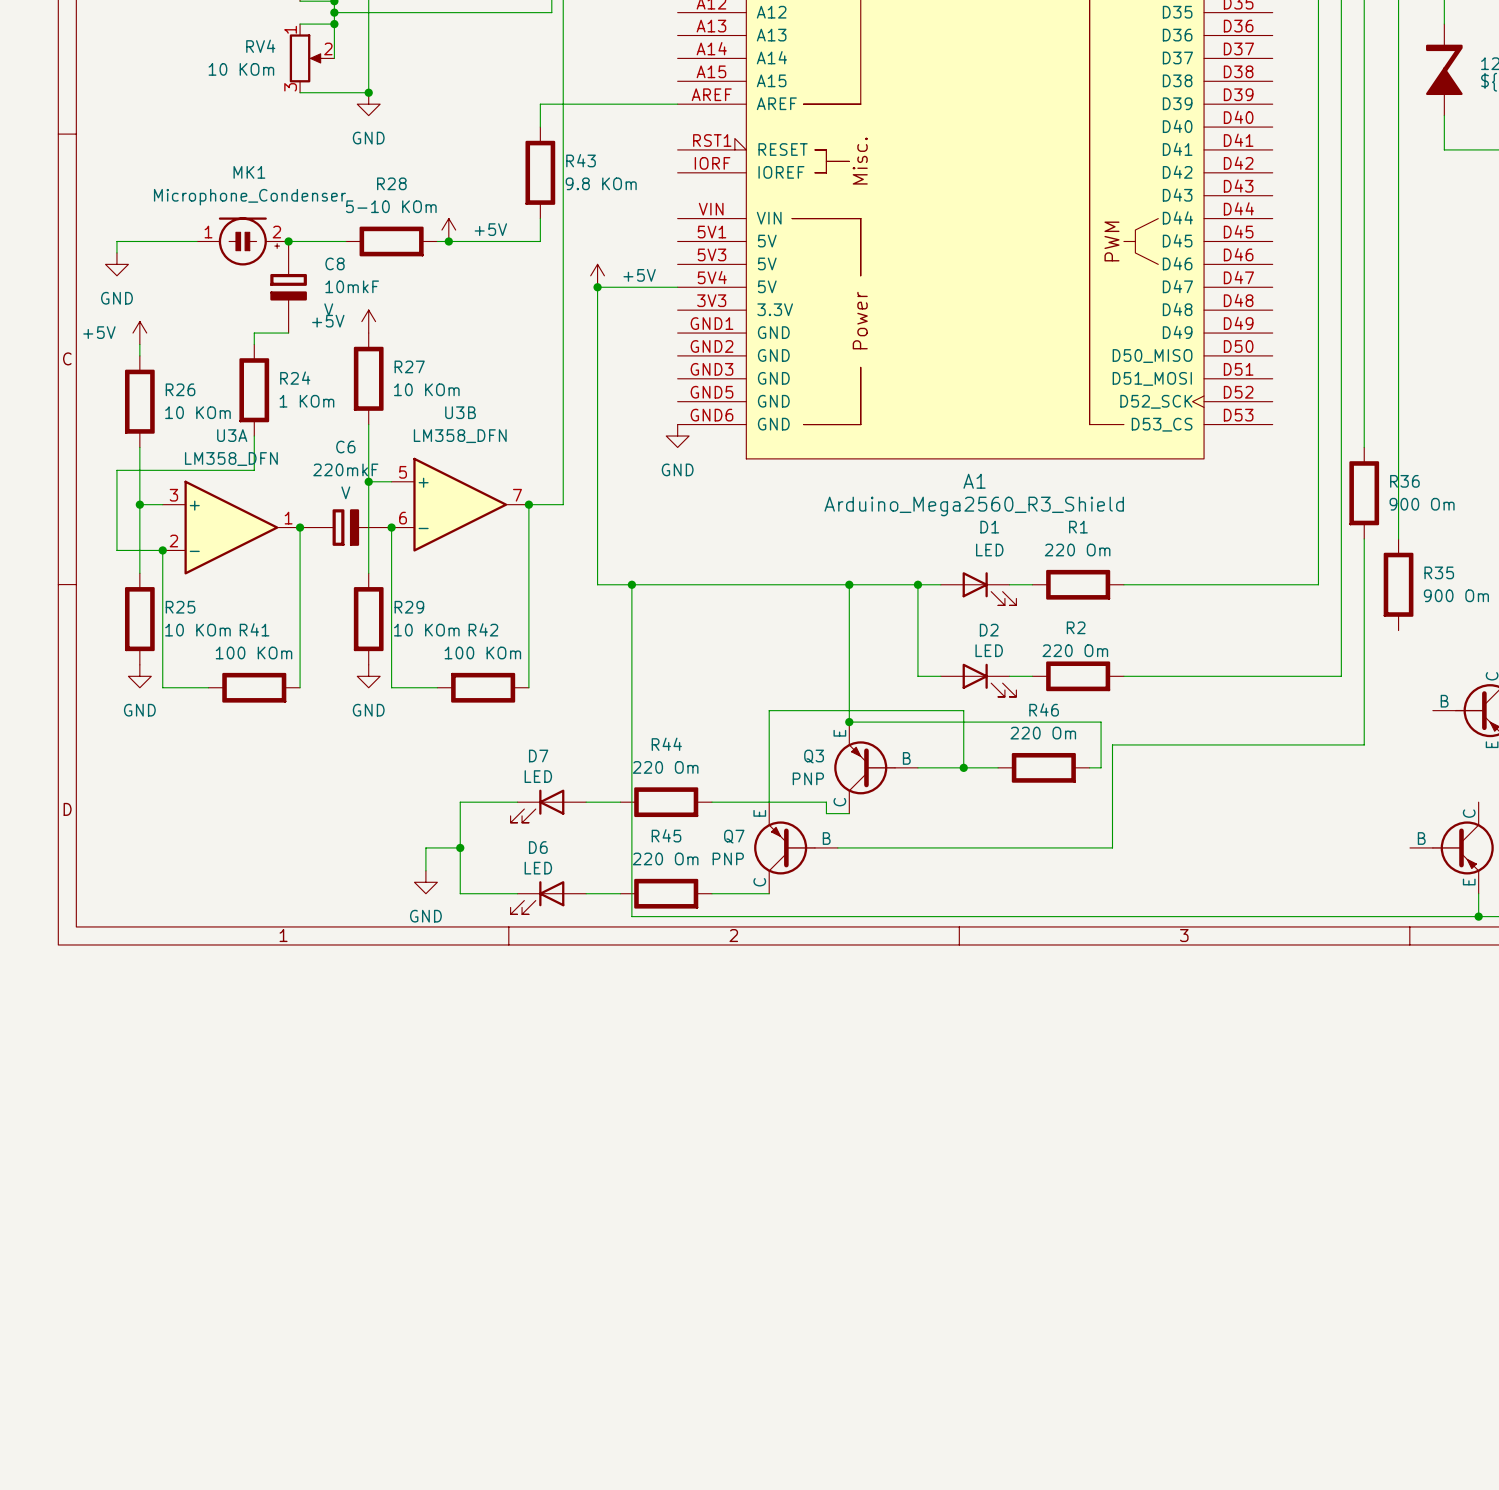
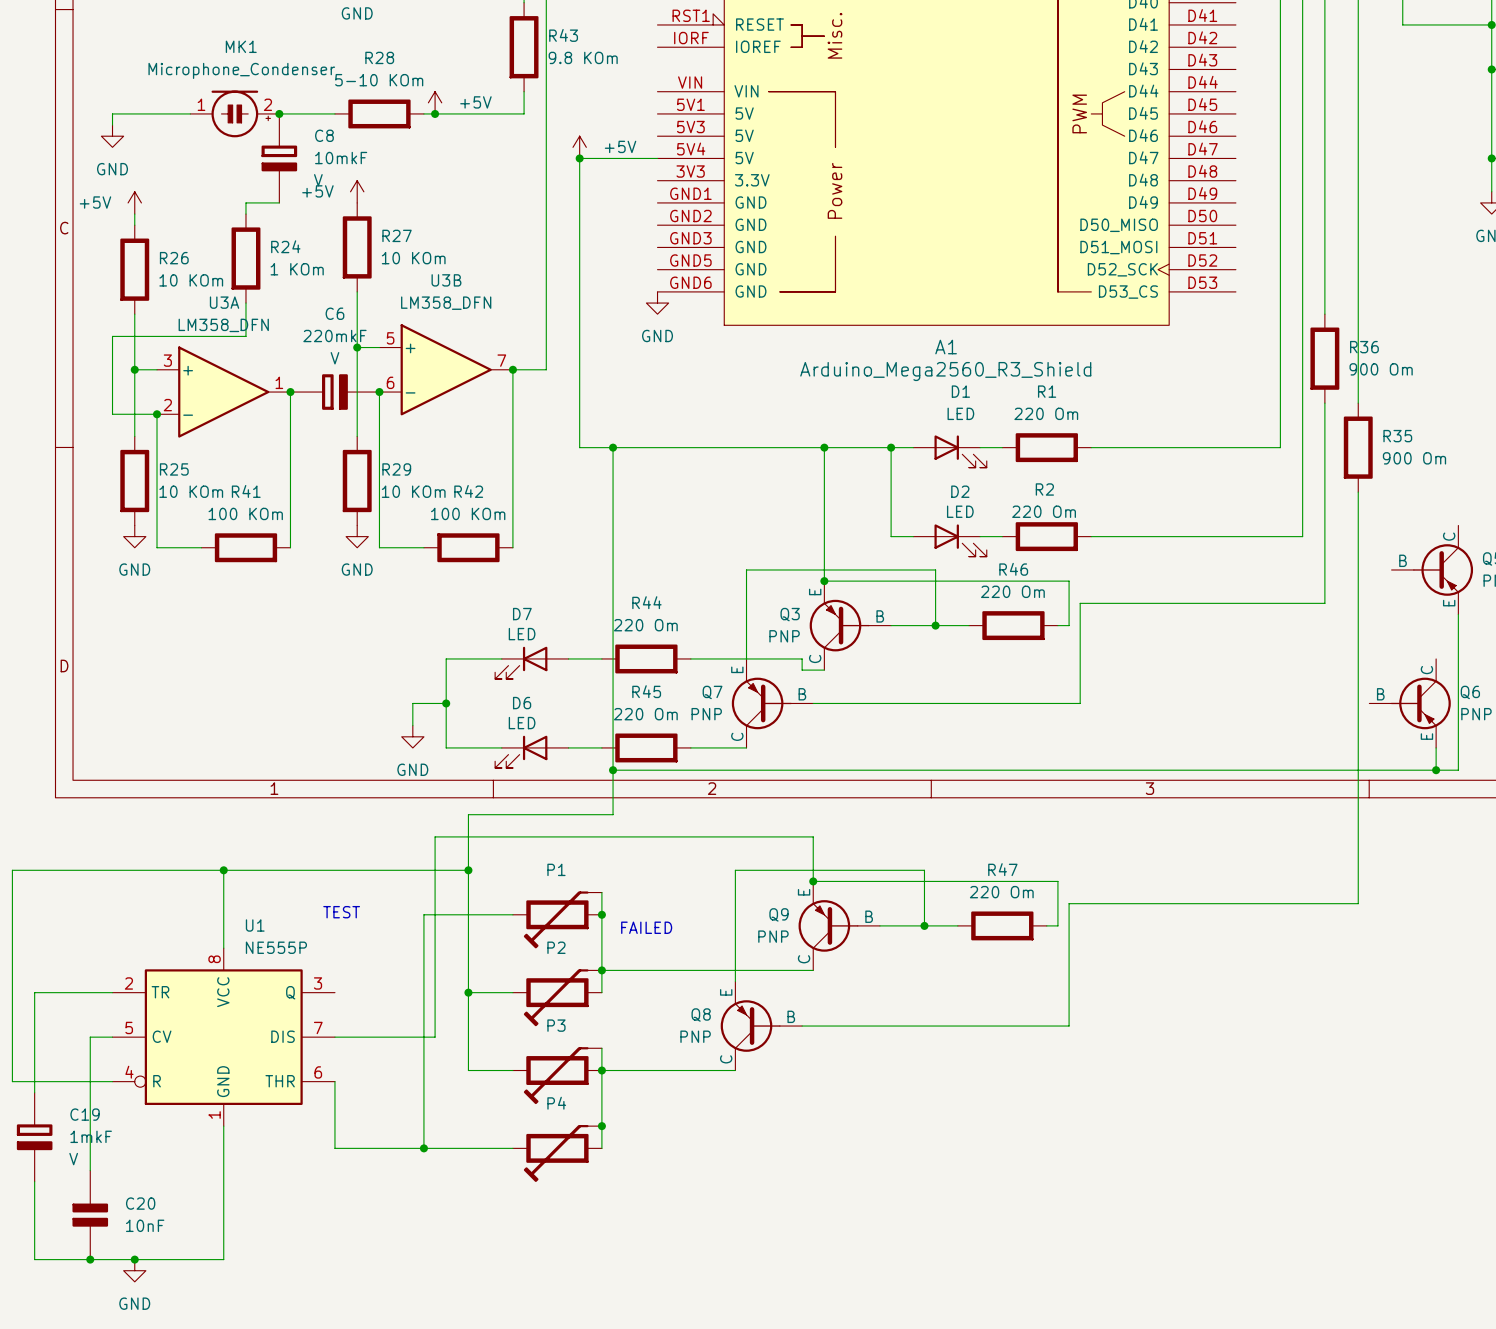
wire: none -> (1358, 492) (1358, 903) (1069, 903) (1069, 1026) (802, 1026)
wire: none -> (613, 770) (613, 814) (468, 814) (468, 1070) (512, 1070)
junction: none -> (613, 770)
wire: none -> (223, 870) (223, 948)
junction: none -> (223, 870)
wire: none -> (468, 870) (12, 870) (12, 1081) (112, 1081)
junction: none -> (468, 870)
junction: none -> (813, 881)
wire: none -> (601, 892) (601, 992)
text: none -> TEST (341, 912)
wire: none -> (512, 914) (423, 914) (423, 1148)
junction: none -> (601, 914)
P1: none -> (557, 919)
Q9: none -> PNP (839, 925)
wire: none -> (879, 925) (957, 925)
wire: none -> (924, 925) (924, 870) (735, 870) (735, 981)
junction: none -> (924, 925)
R47: none -> 220 Om (1002, 925)
wire: none -> (1046, 925) (1057, 925) (1057, 881) (813, 881) (813, 836) (435, 836) (435, 1037) (334, 1037)
text: none -> FAILED (646, 927)
wire: none -> (601, 970) (813, 970)
junction: none -> (601, 970)
wire: none -> (112, 992) (34, 992) (34, 1092)
wire: none -> (468, 992) (512, 992)
junction: none -> (468, 992)
P2: none -> (557, 997)
Q8: none -> PNP (761, 1026)
wire: none -> (112, 1037) (90, 1037) (90, 1170)
U1: none -> NE555P (223, 1037)
wire: none -> (601, 1048) (601, 1148)
wire: none -> (601, 1070) (735, 1070)
junction: none -> (601, 1070)
P3: none -> (557, 1075)
wire: none -> (334, 1081) (334, 1148) (512, 1148)
wire: none -> (223, 1126) (223, 1259) (34, 1259) (34, 1181)
junction: none -> (601, 1126)
C19: none -> 1mkF (34, 1137)
junction: none -> (423, 1148)
P4: none -> (557, 1153)
C20: none -> 10nF (90, 1215)
junction: none -> (90, 1259)
junction: none -> (134, 1259)
power symbol: none -> GND (134, 1270)

